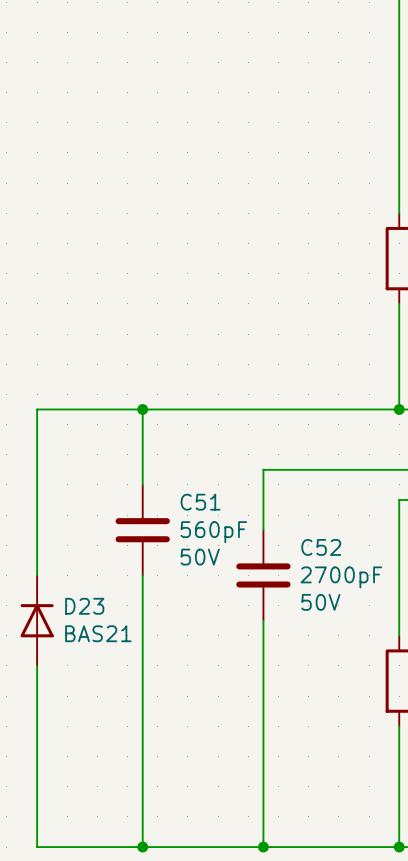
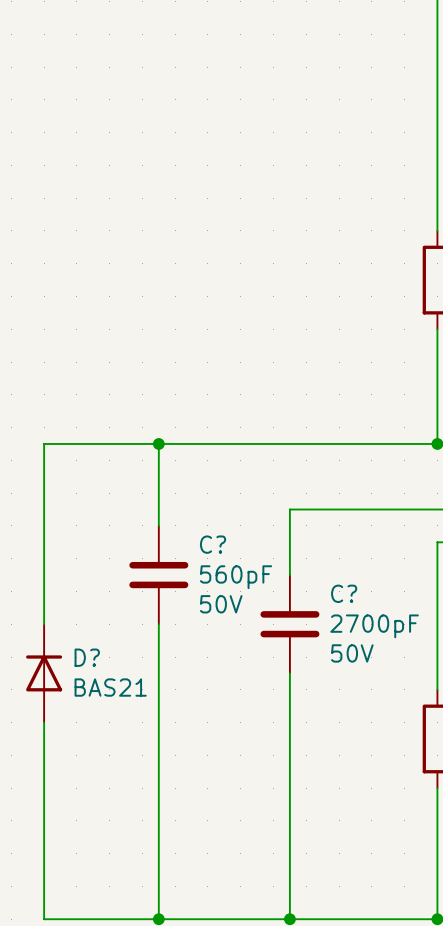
C51 name: C51 (200, 502) -> C? (213, 544)
C52 name: C52 (321, 547) -> C? (344, 593)
D23 name: D23 (84, 606) -> D? (87, 657)

